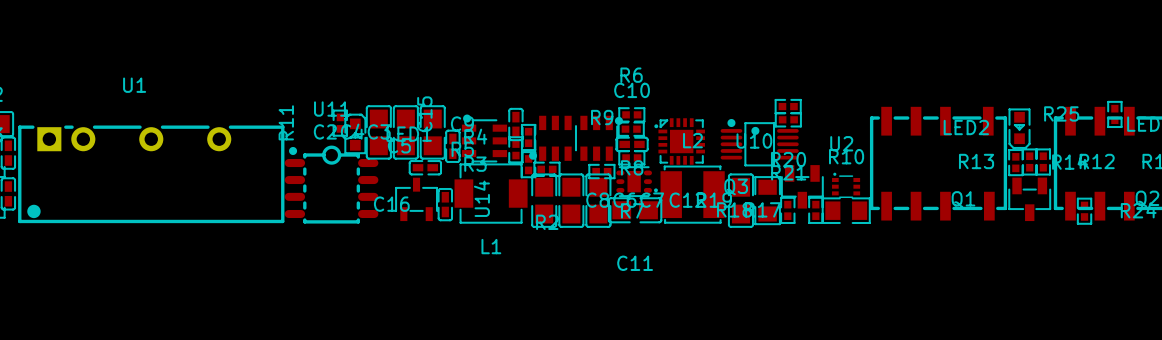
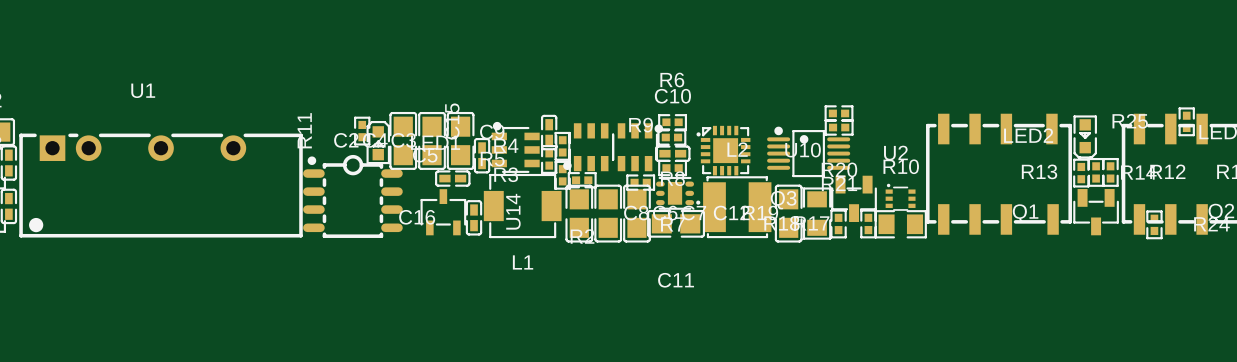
U11 name: U11 (331, 109) -> none

